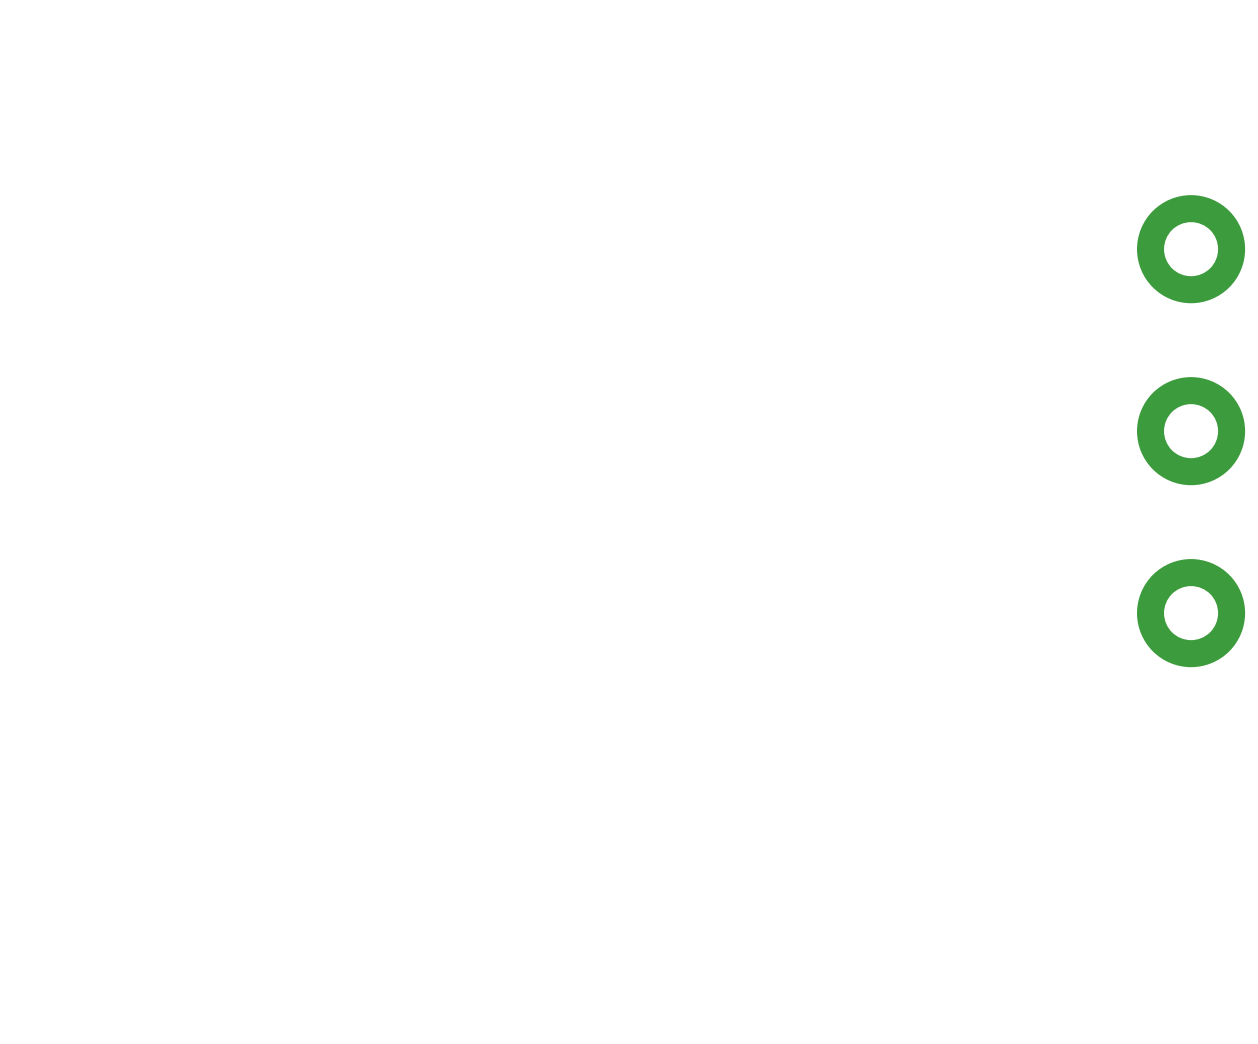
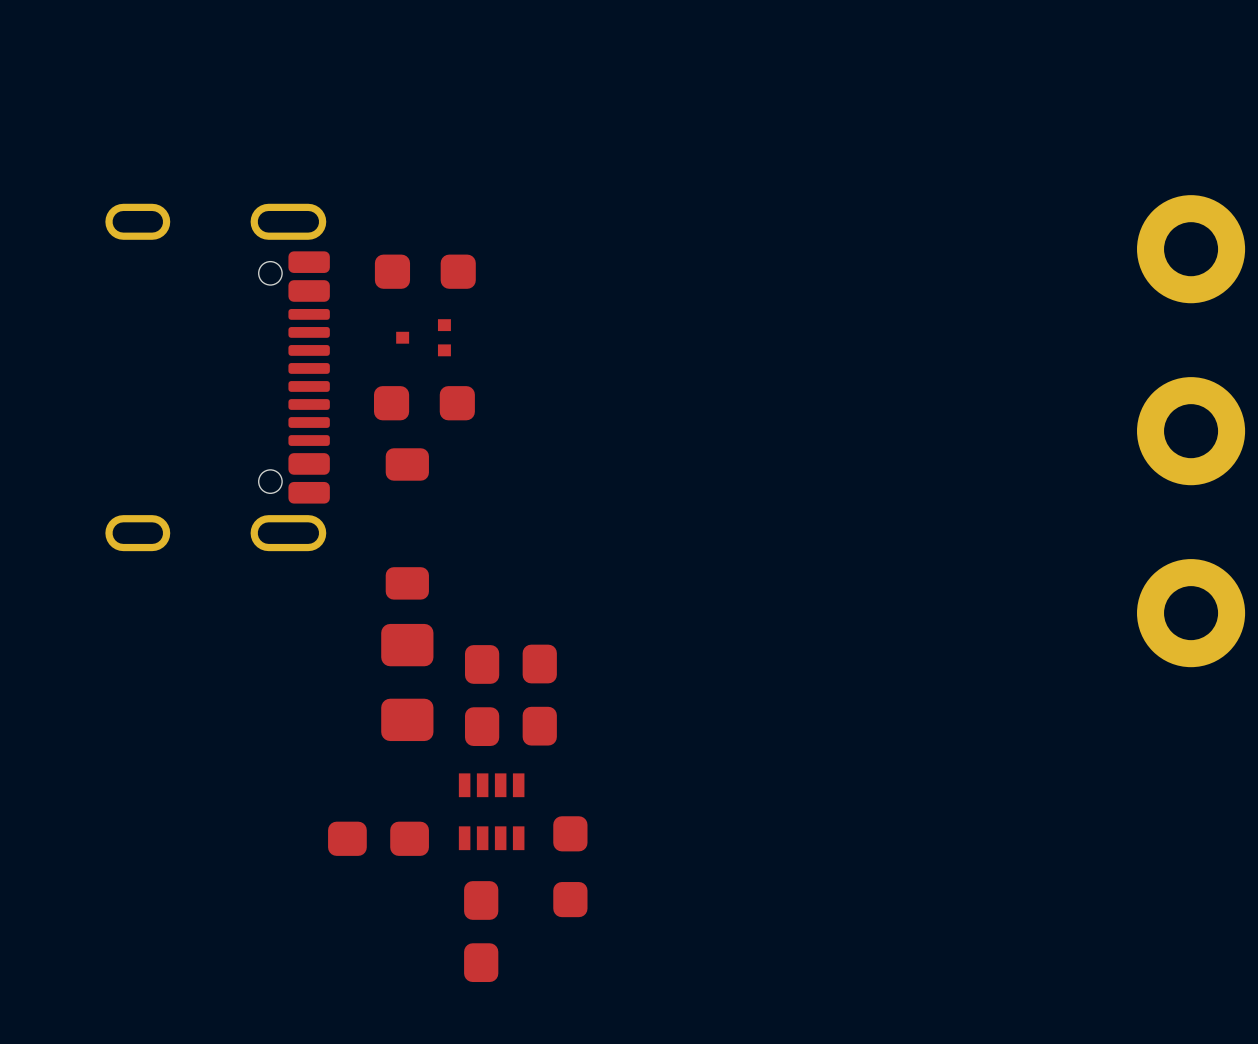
part: none -> (425, 271)
part: none -> (423, 337)
part: none -> (217, 377)
part: none -> (424, 403)
part: none -> (407, 523)
part: none -> (407, 682)
part: none -> (482, 695)
part: none -> (539, 695)
part: none -> (491, 811)
part: none -> (378, 838)
part: none -> (570, 866)
part: none -> (481, 931)

